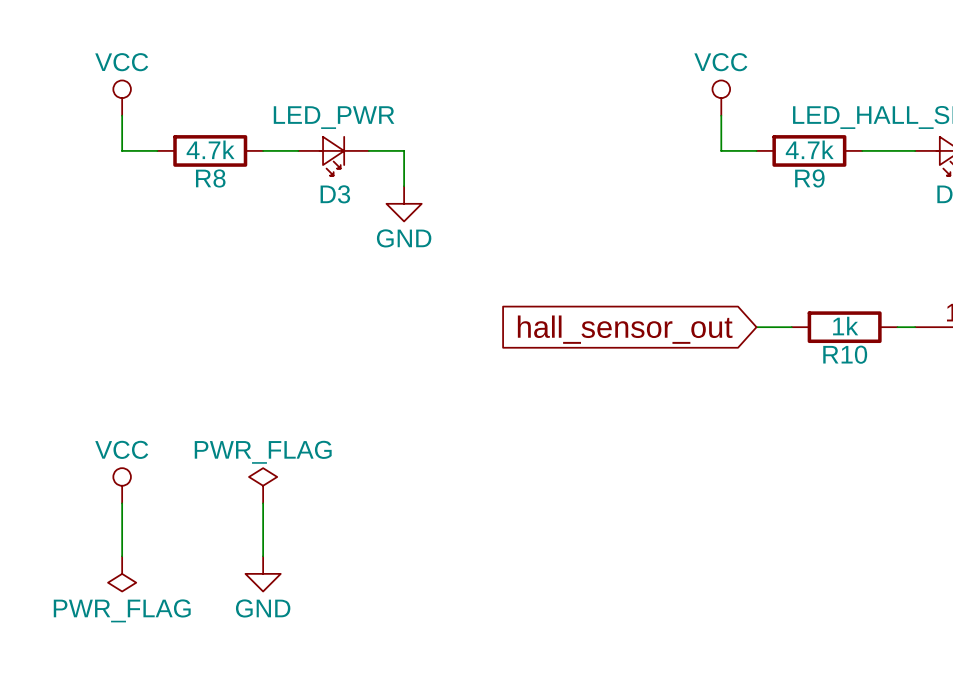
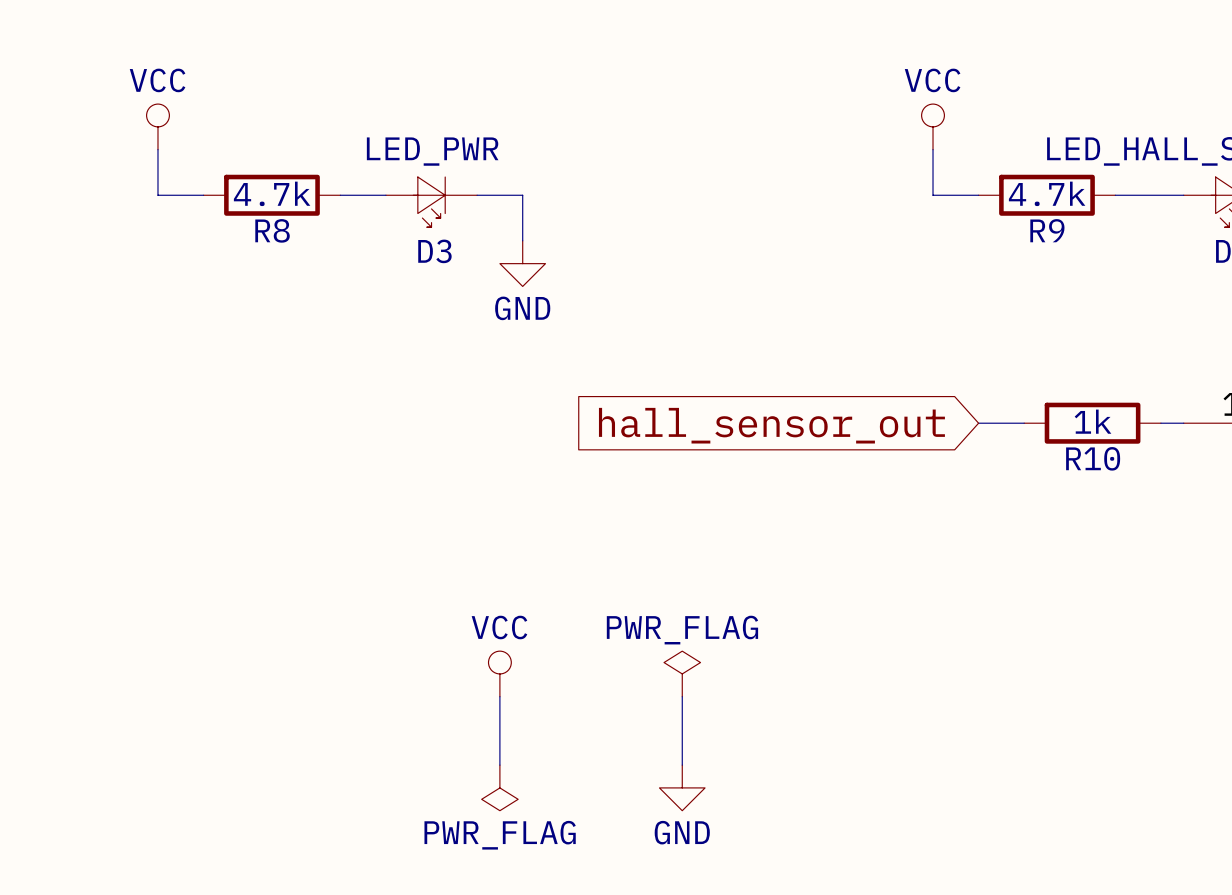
power symbol: VCC (122, 485) -> none
power symbol: PWR_FLAG (263, 485) -> none
wire: (122, 503) (122, 556) -> (499, 696) (499, 765)
wire: (263, 503) (263, 556) -> (682, 696) (682, 765)
power symbol: none -> VCC (499, 673)
power symbol: none -> PWR_FLAG (682, 673)
power symbol: PWR_FLAG (122, 573) -> none
power symbol position: GND (263, 573) -> GND (682, 787)
power symbol: none -> PWR_FLAG (499, 787)

